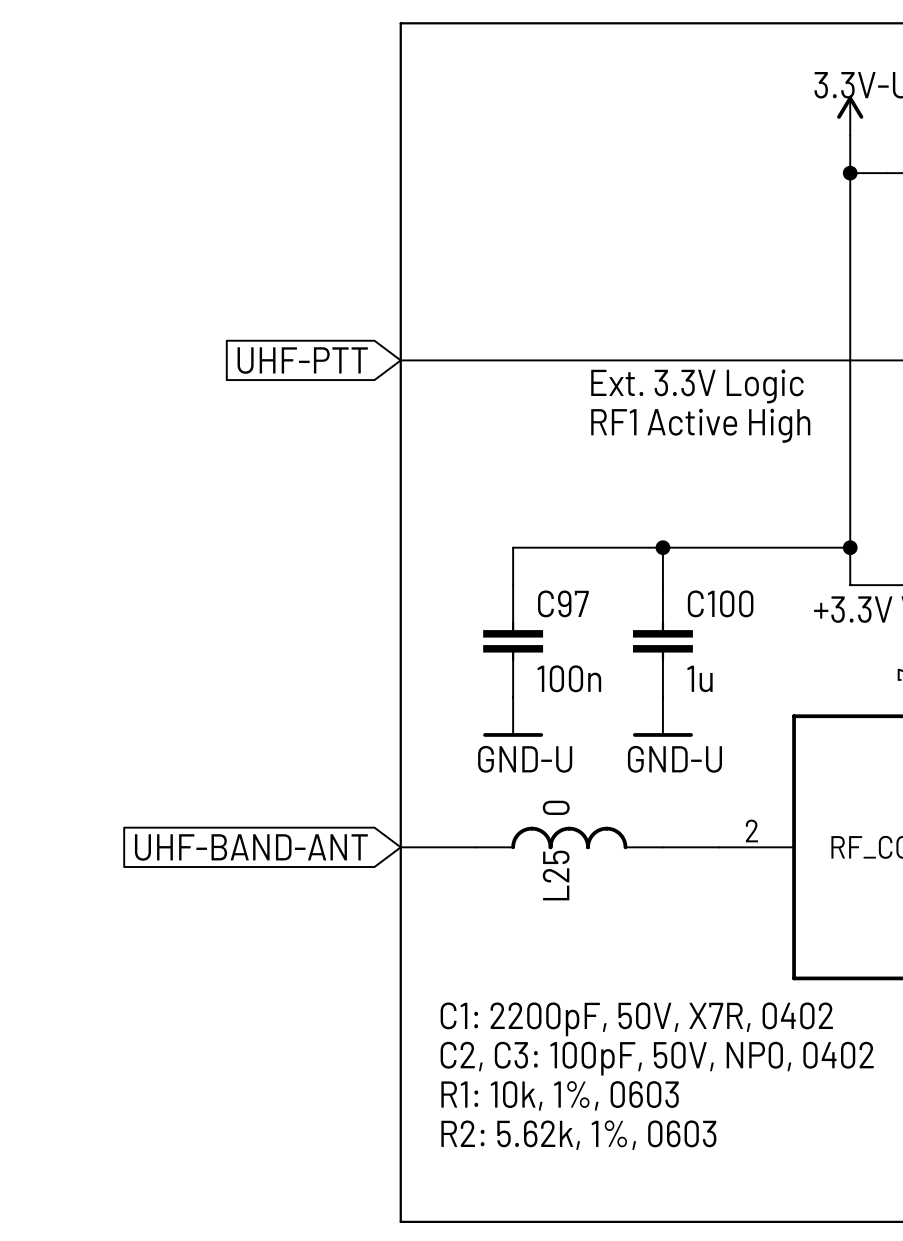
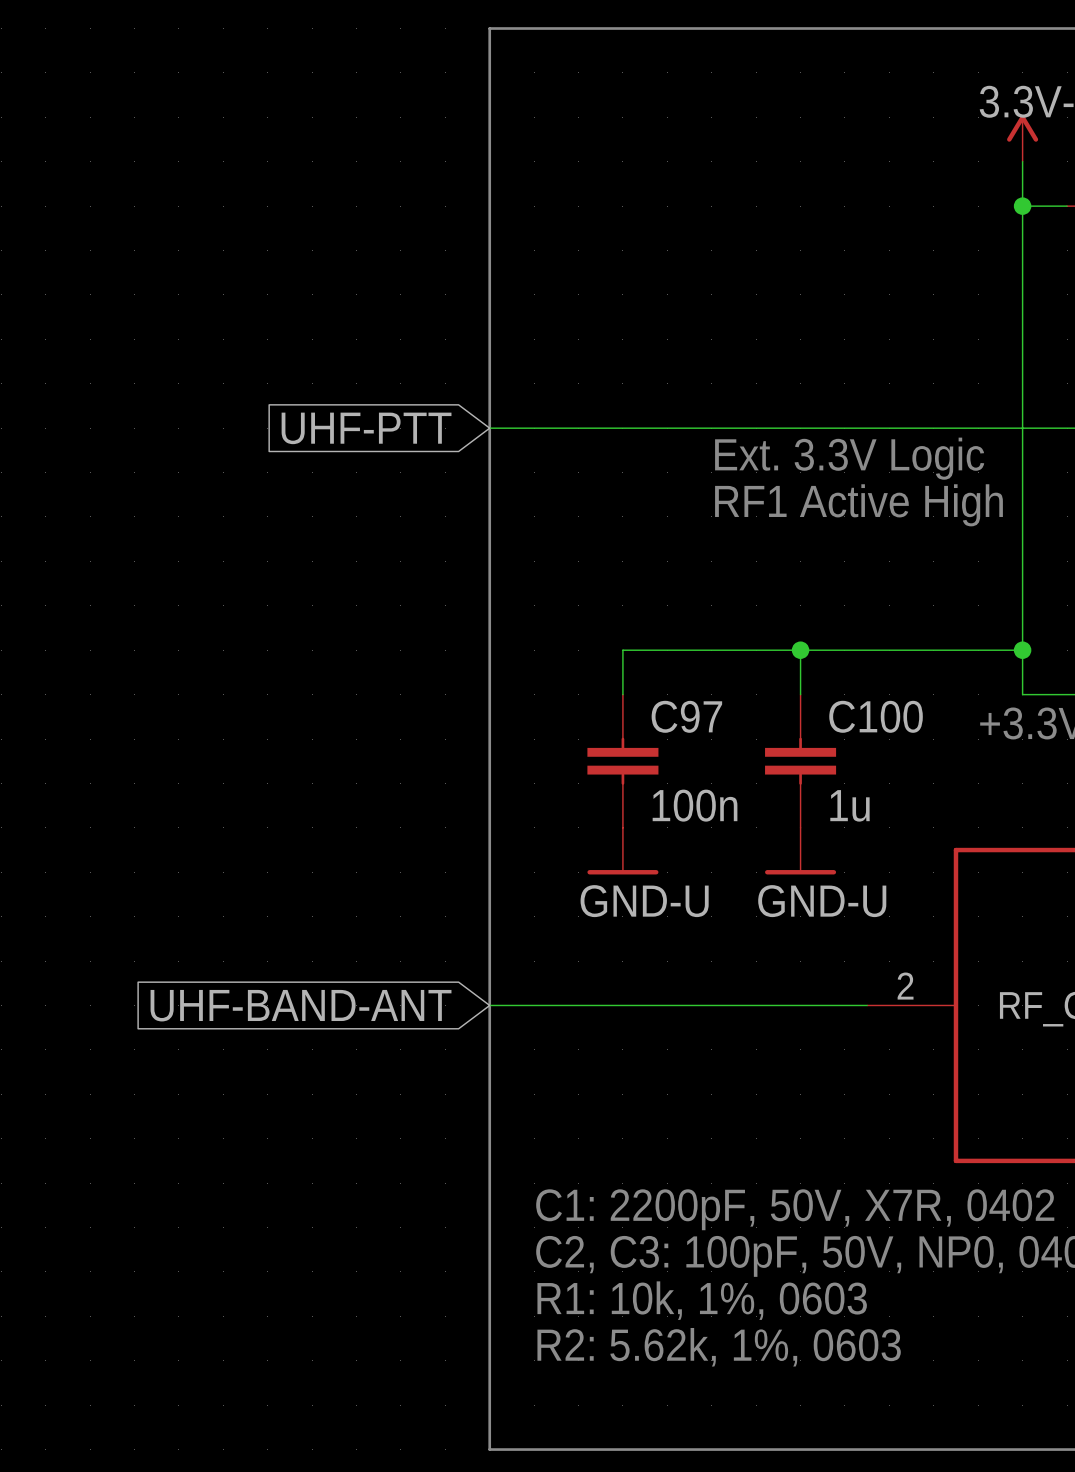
L25: 0 (569, 837) -> none
wire: none -> (578, 1005) (800, 1005)

